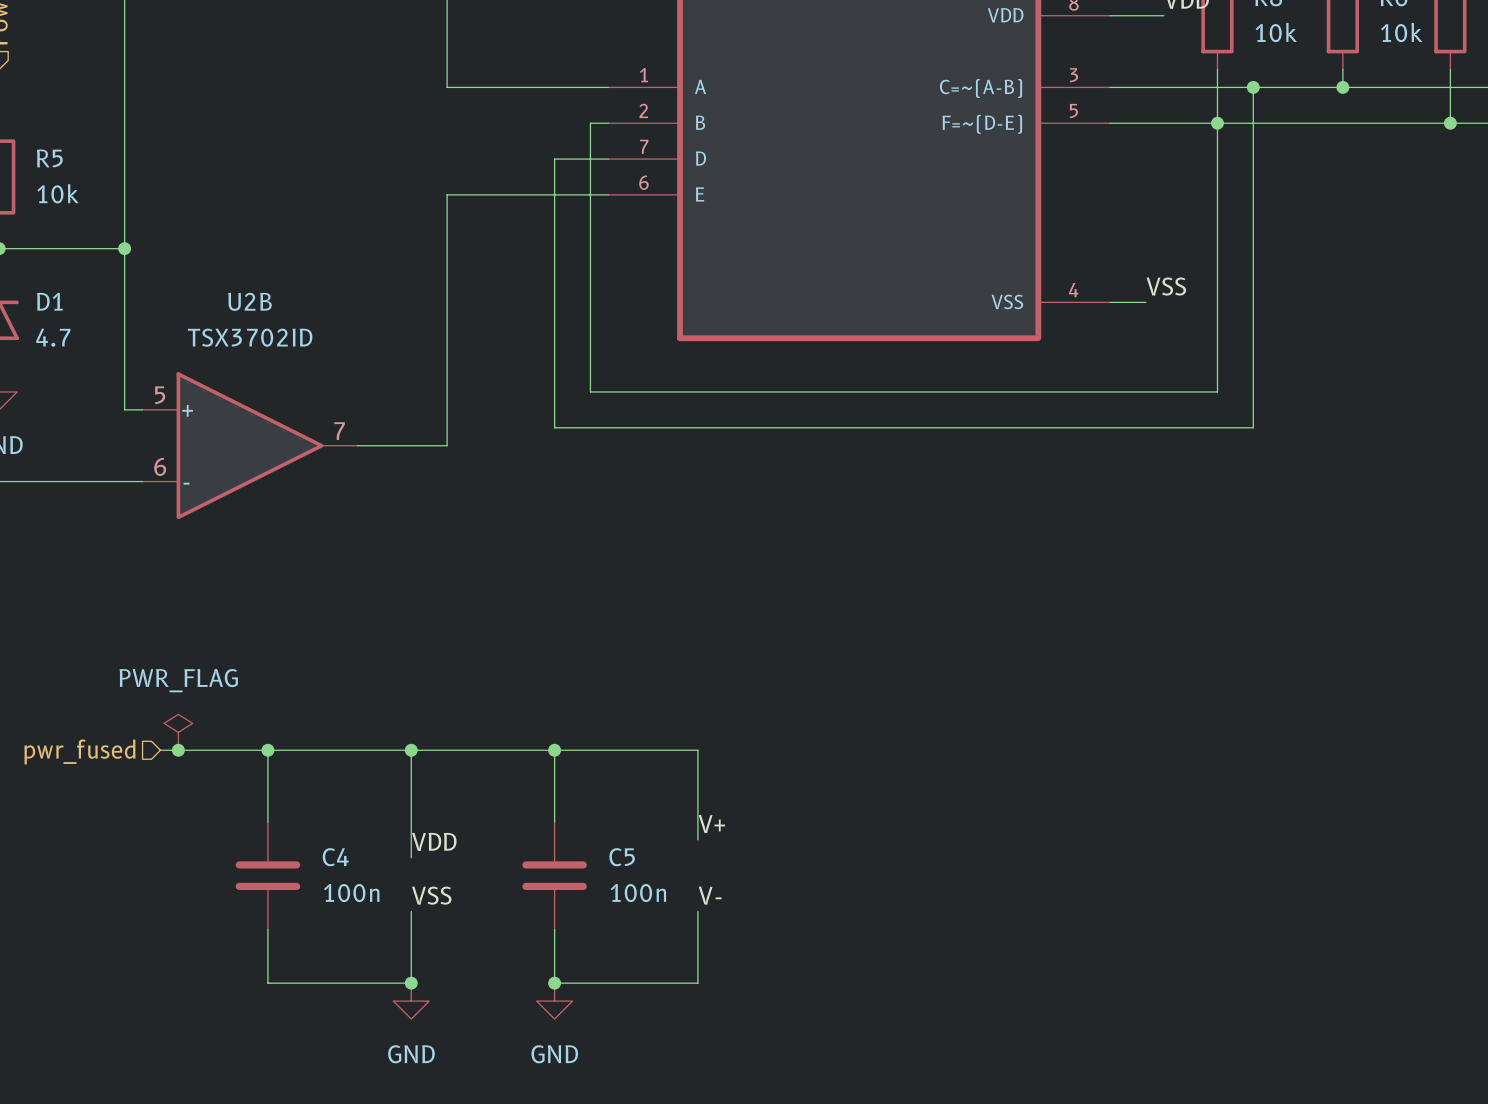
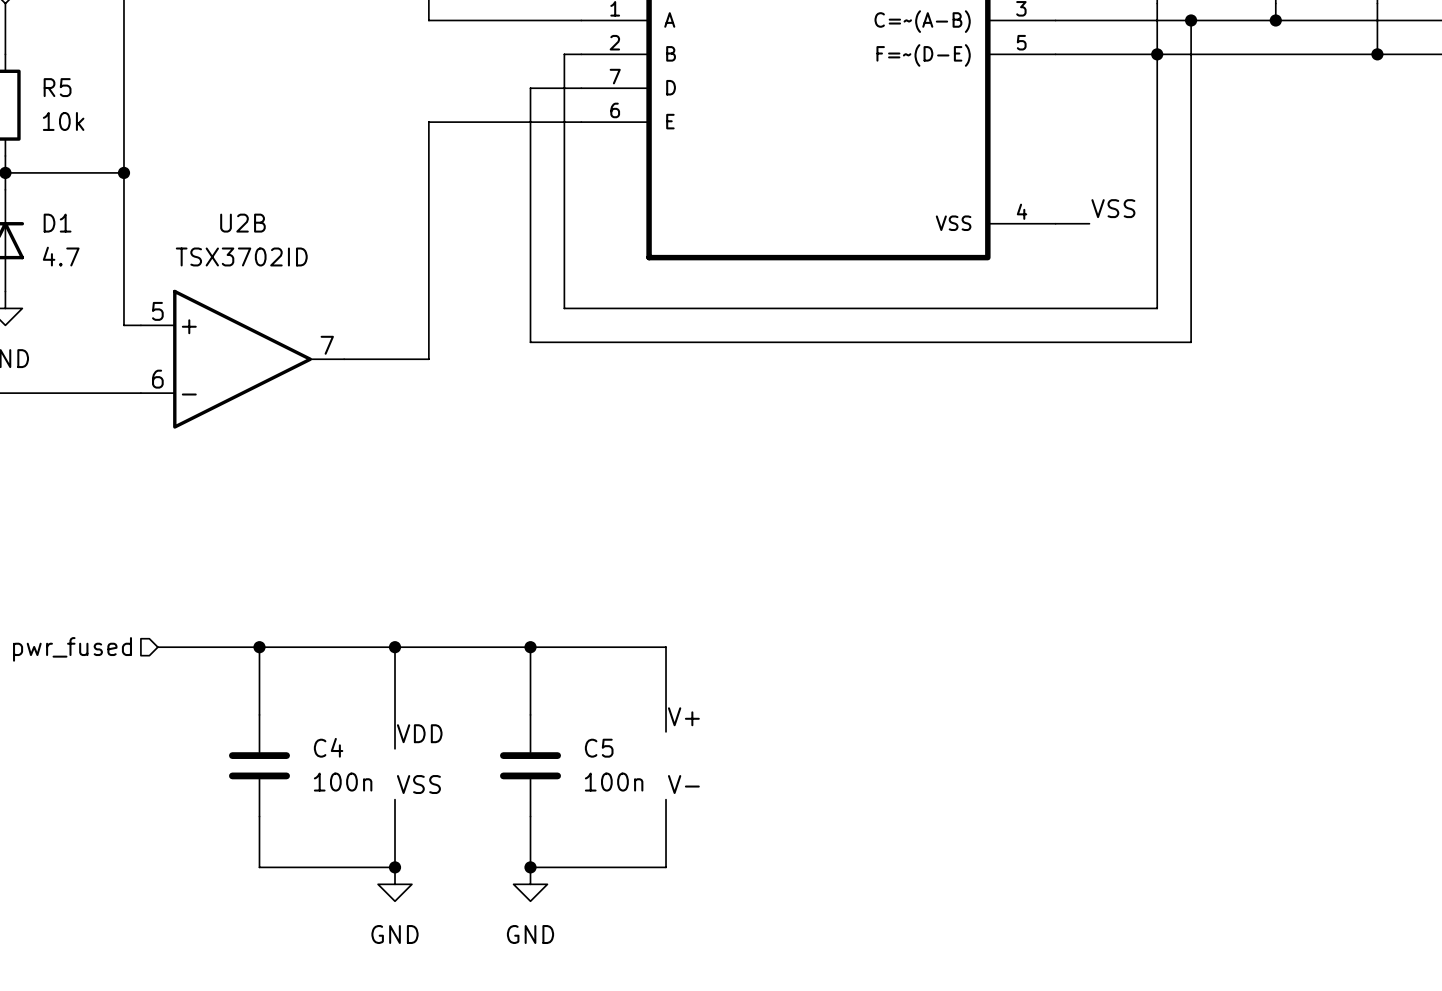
power symbol: PWR_FLAG (178, 732) -> none
junction: (178, 750) -> none

